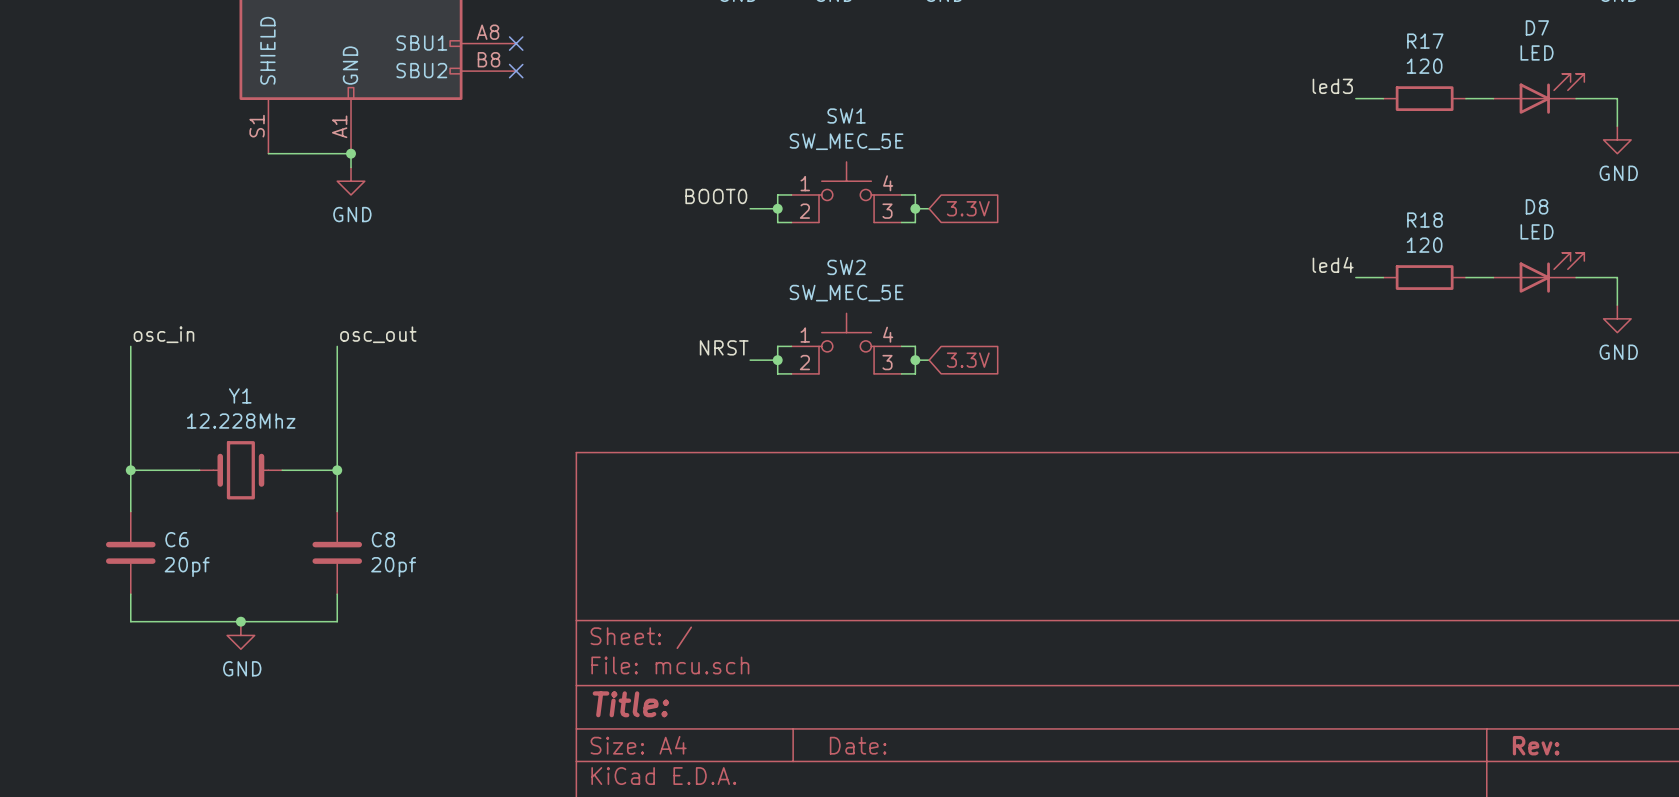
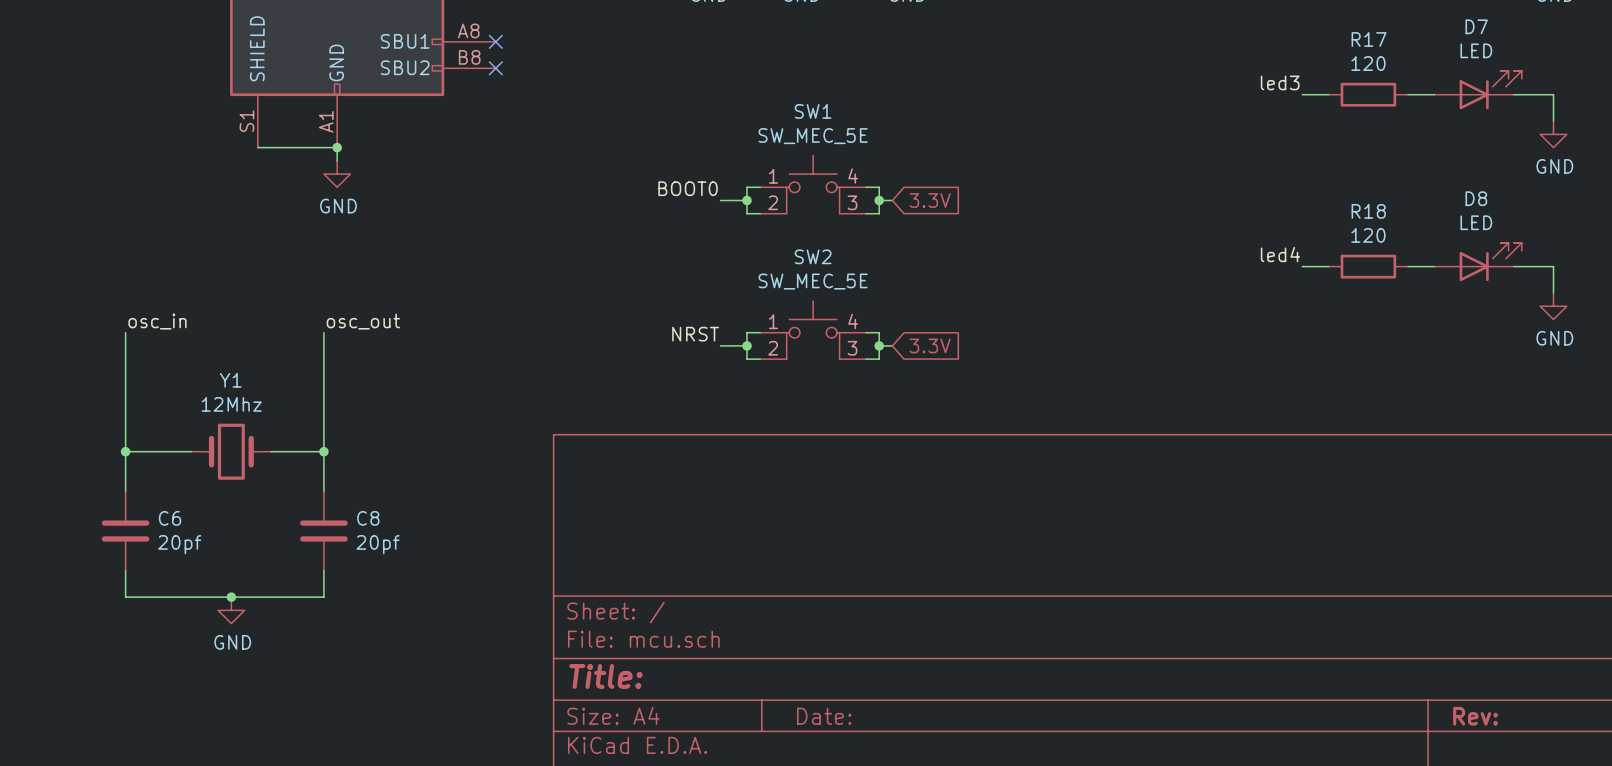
Y1 value: 12.228Mhz (241, 421) -> 12Mhz (231, 404)

